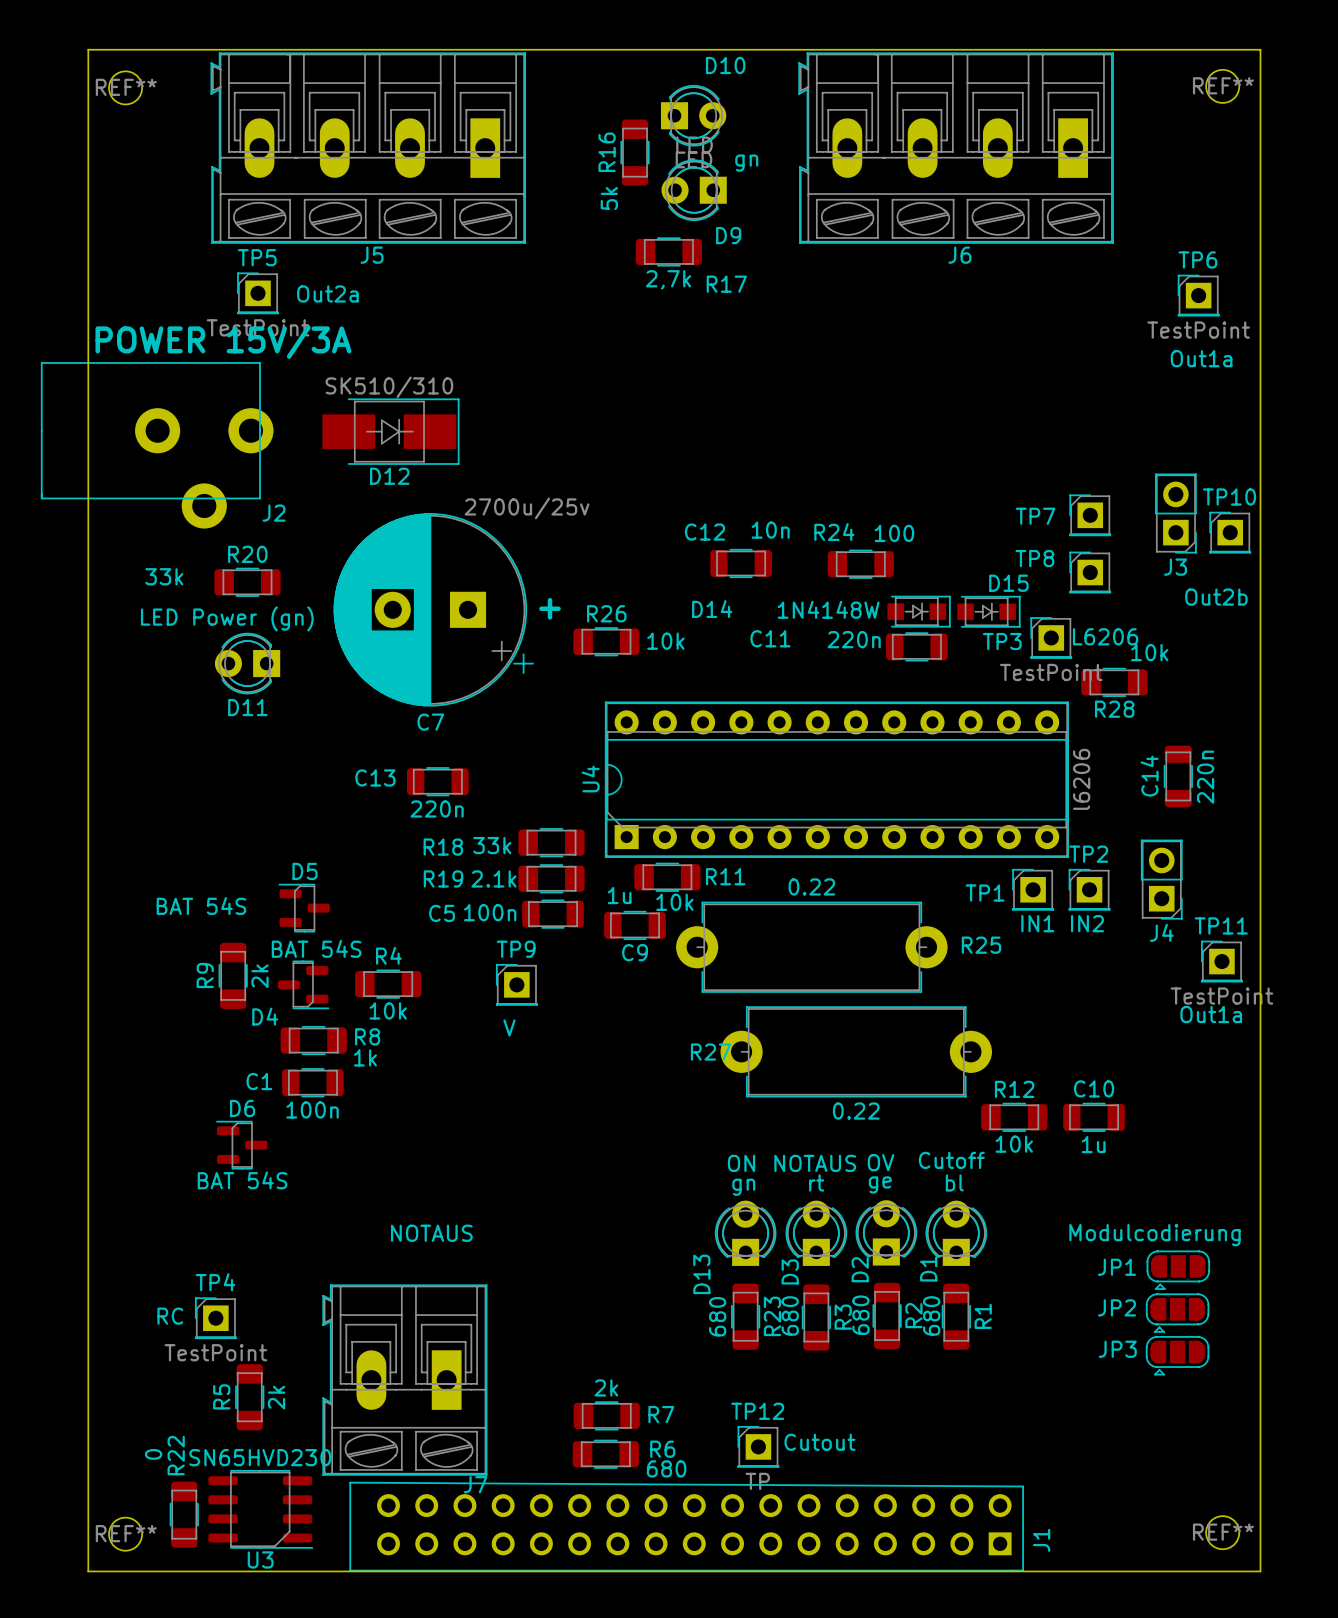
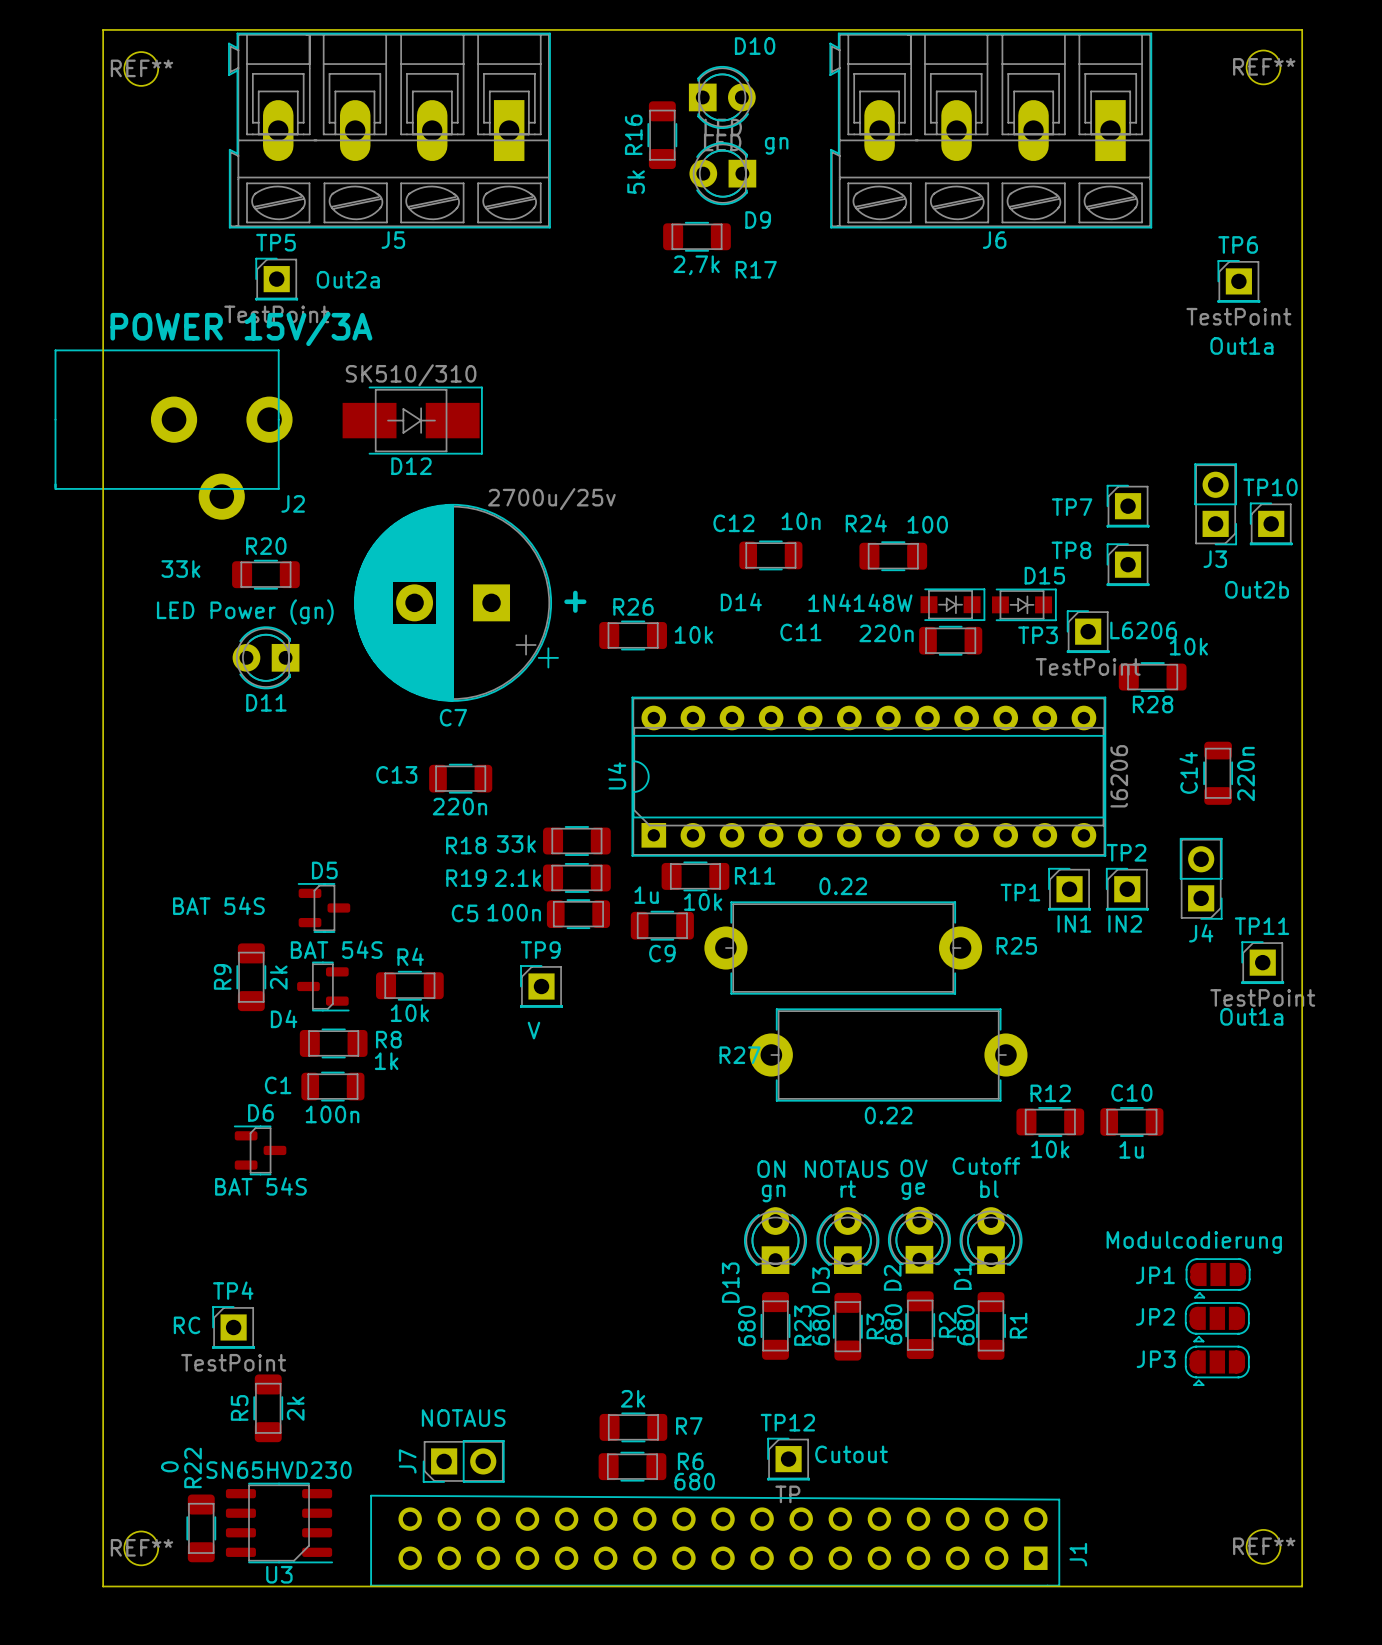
text position: NOTAUS (431, 1233) -> NOTAUS (463, 1418)
J7 footprint: [322, 1284, 488, 1476] -> [422, 1440, 505, 1483]
J7 name position: J7 (475, 1484) -> J7 (407, 1461)

